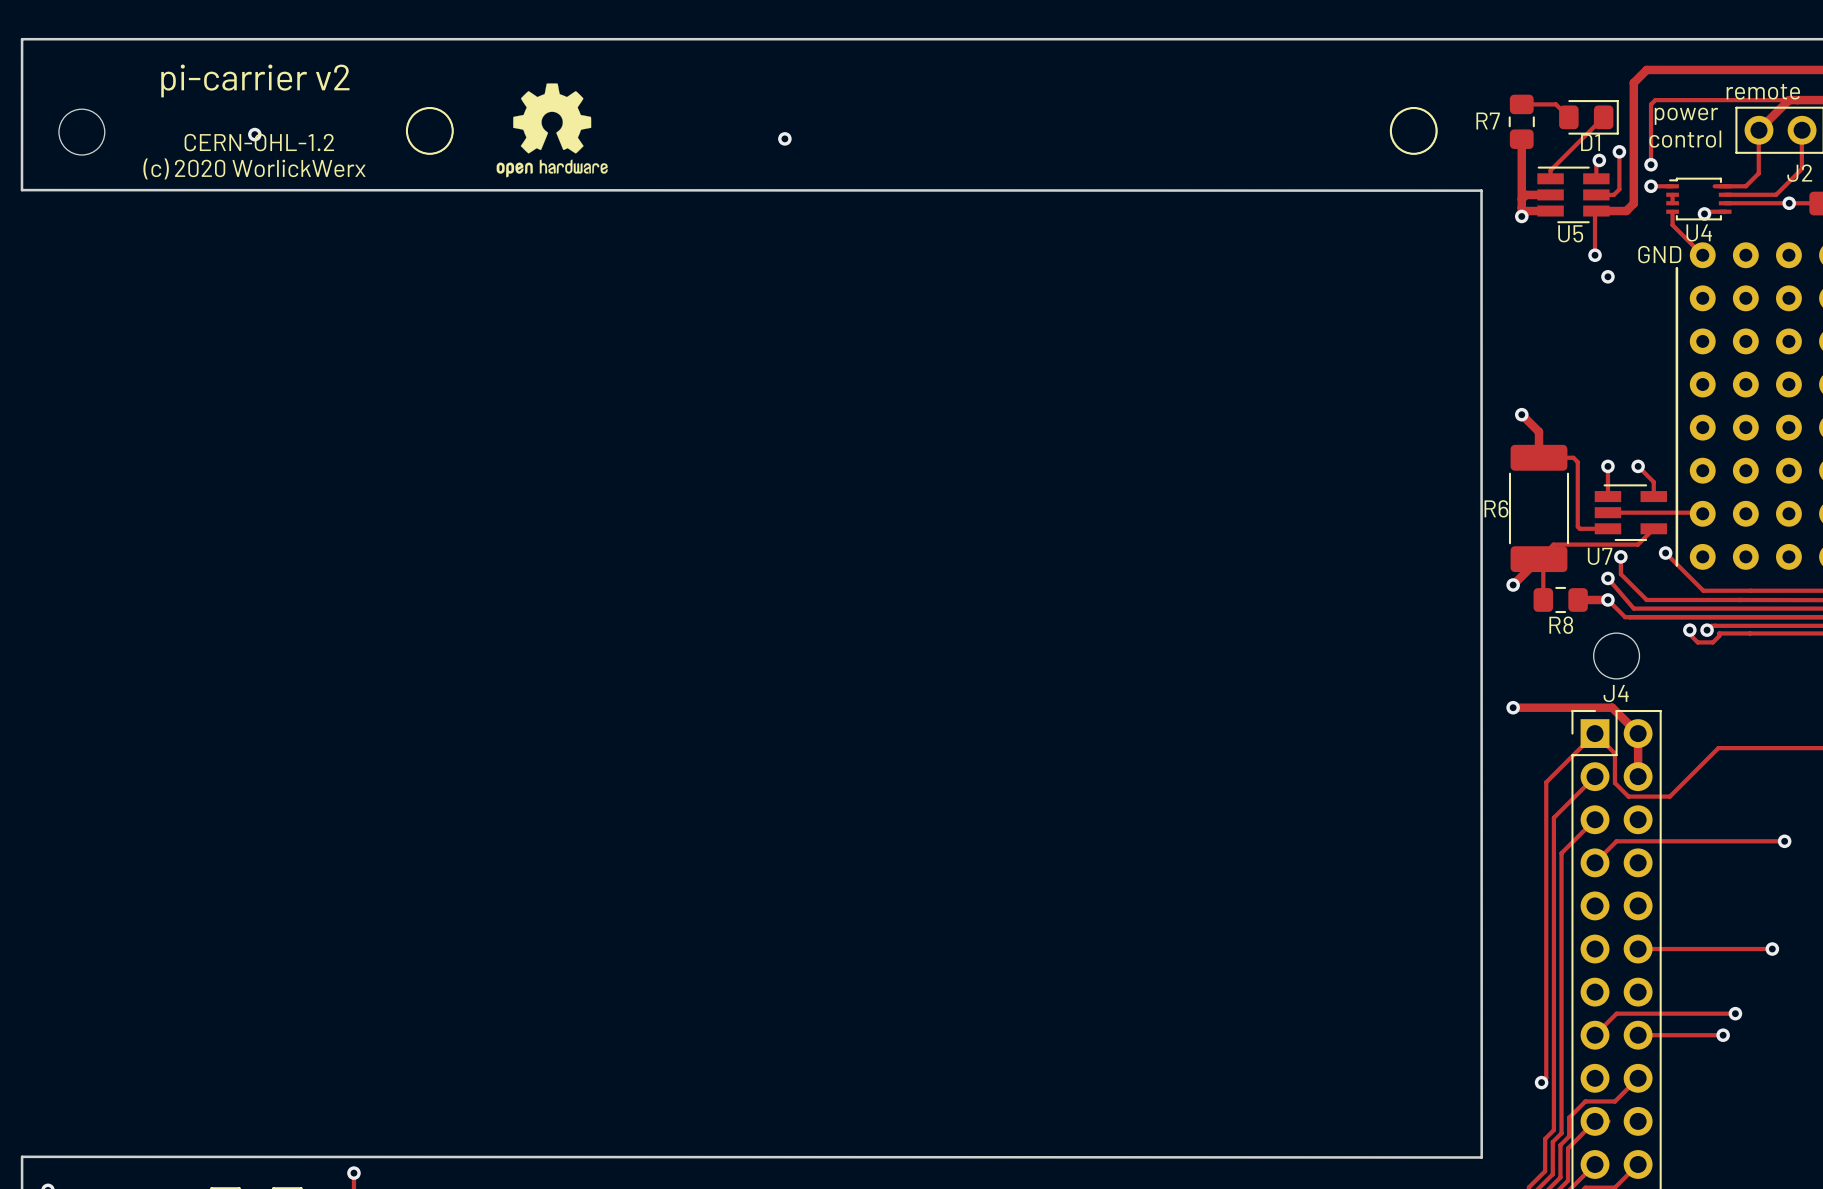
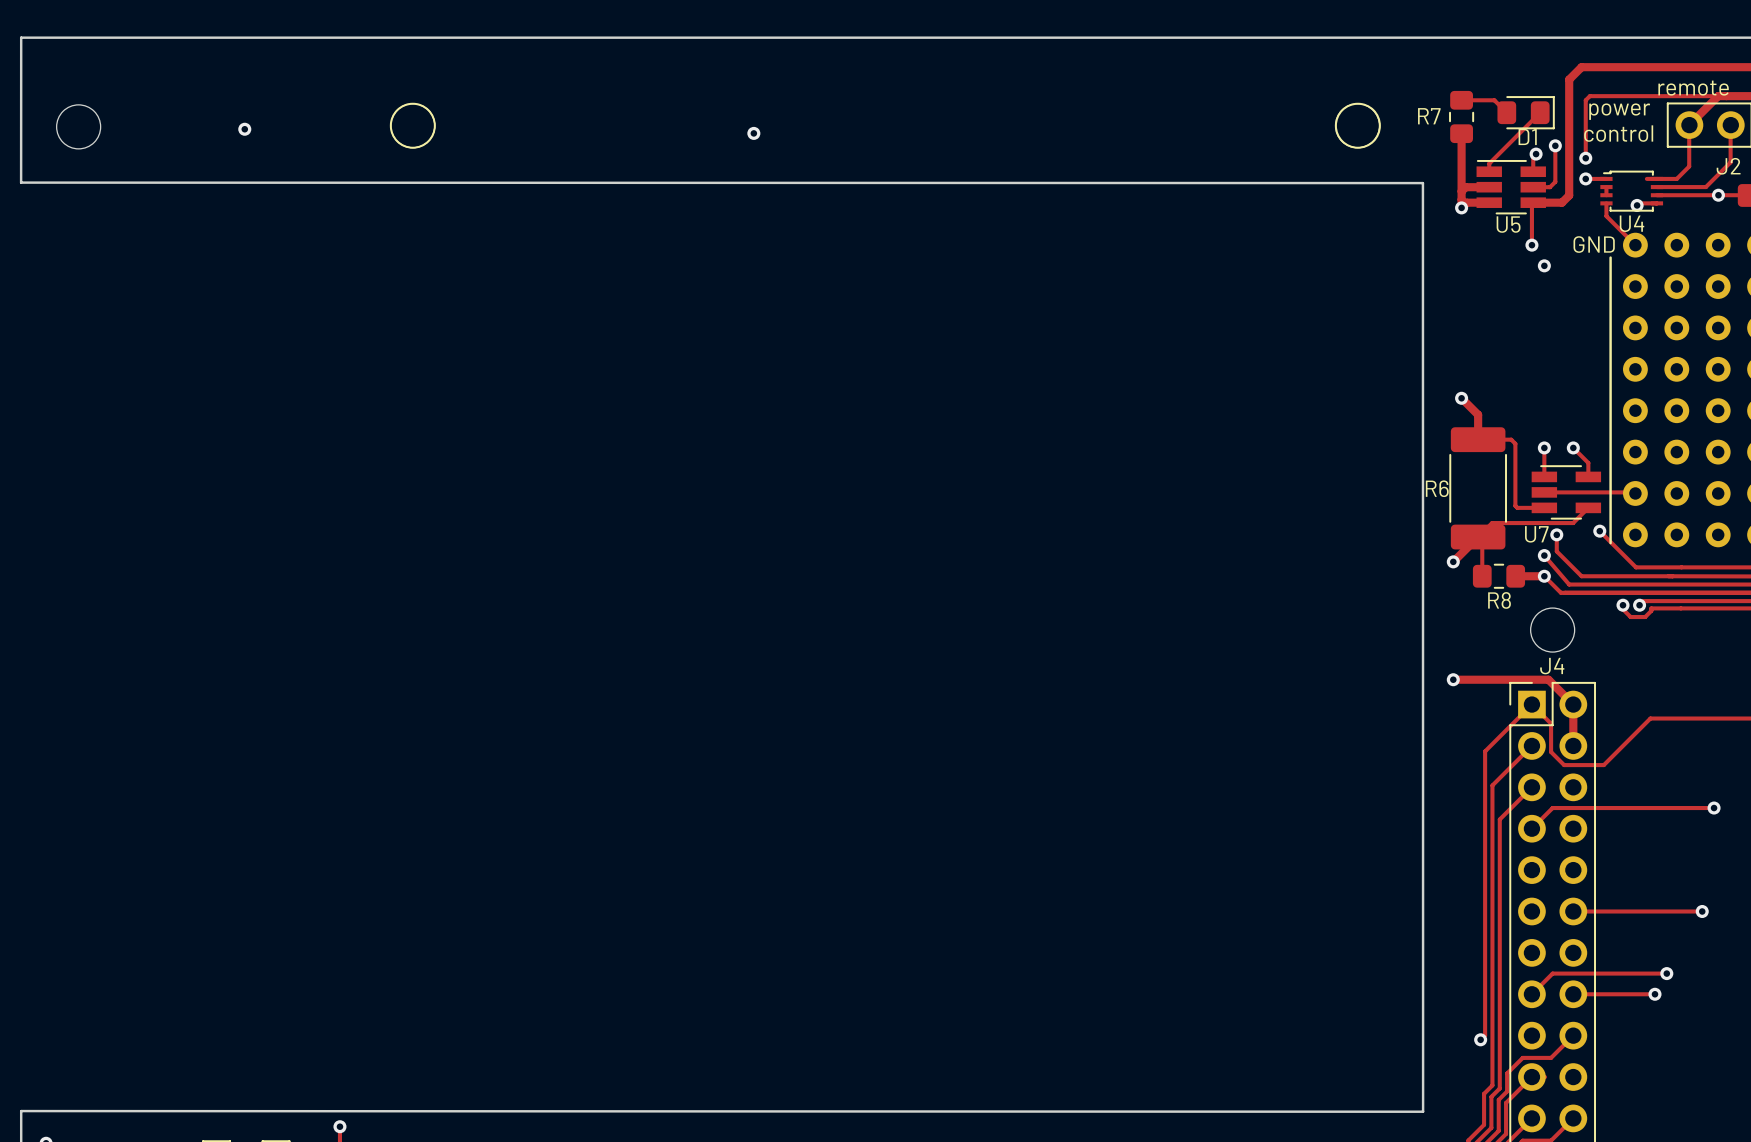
text: pi-carrier v2 (255, 80) -> none
drawing: [496, 83, 608, 178] -> none
text: CERN-OHL-1.2 (259, 142) -> none
text: (c) 2020 WorlickWerx (254, 168) -> none

